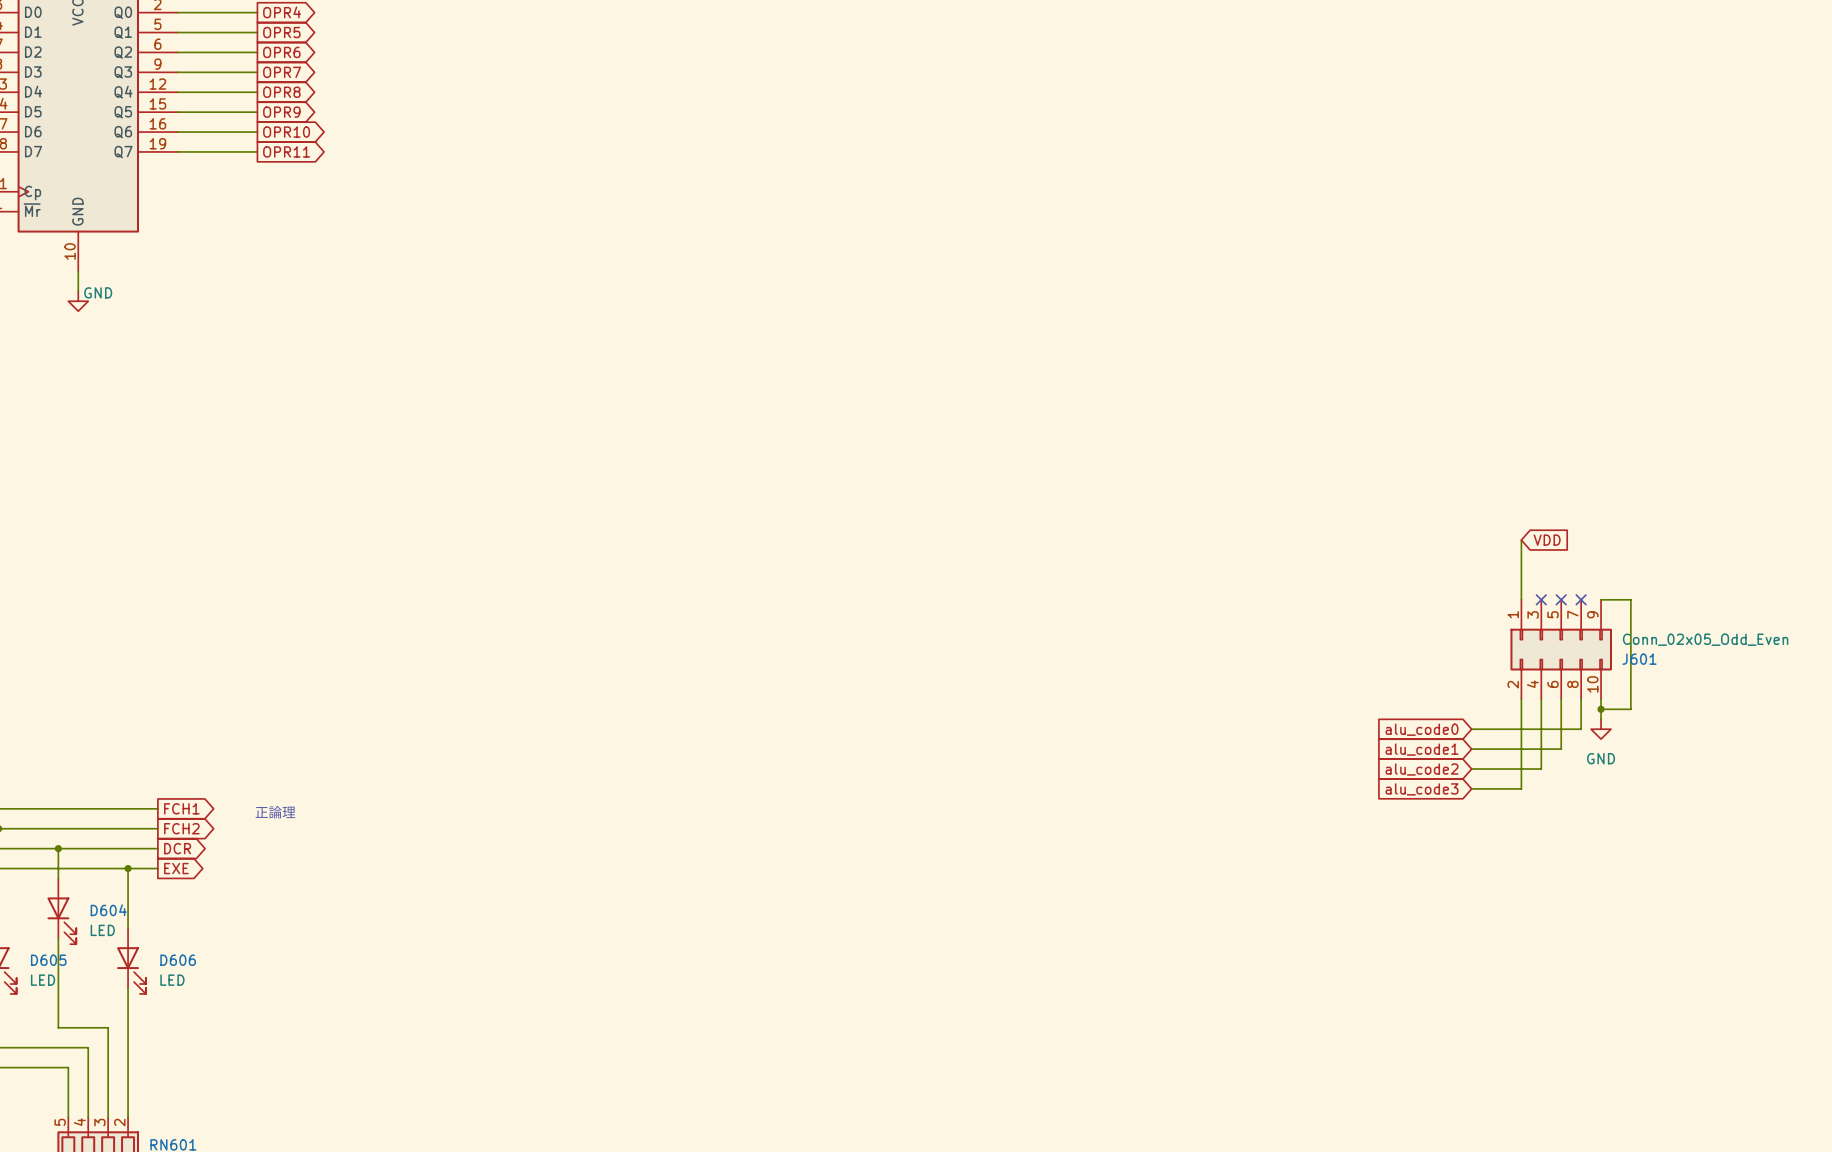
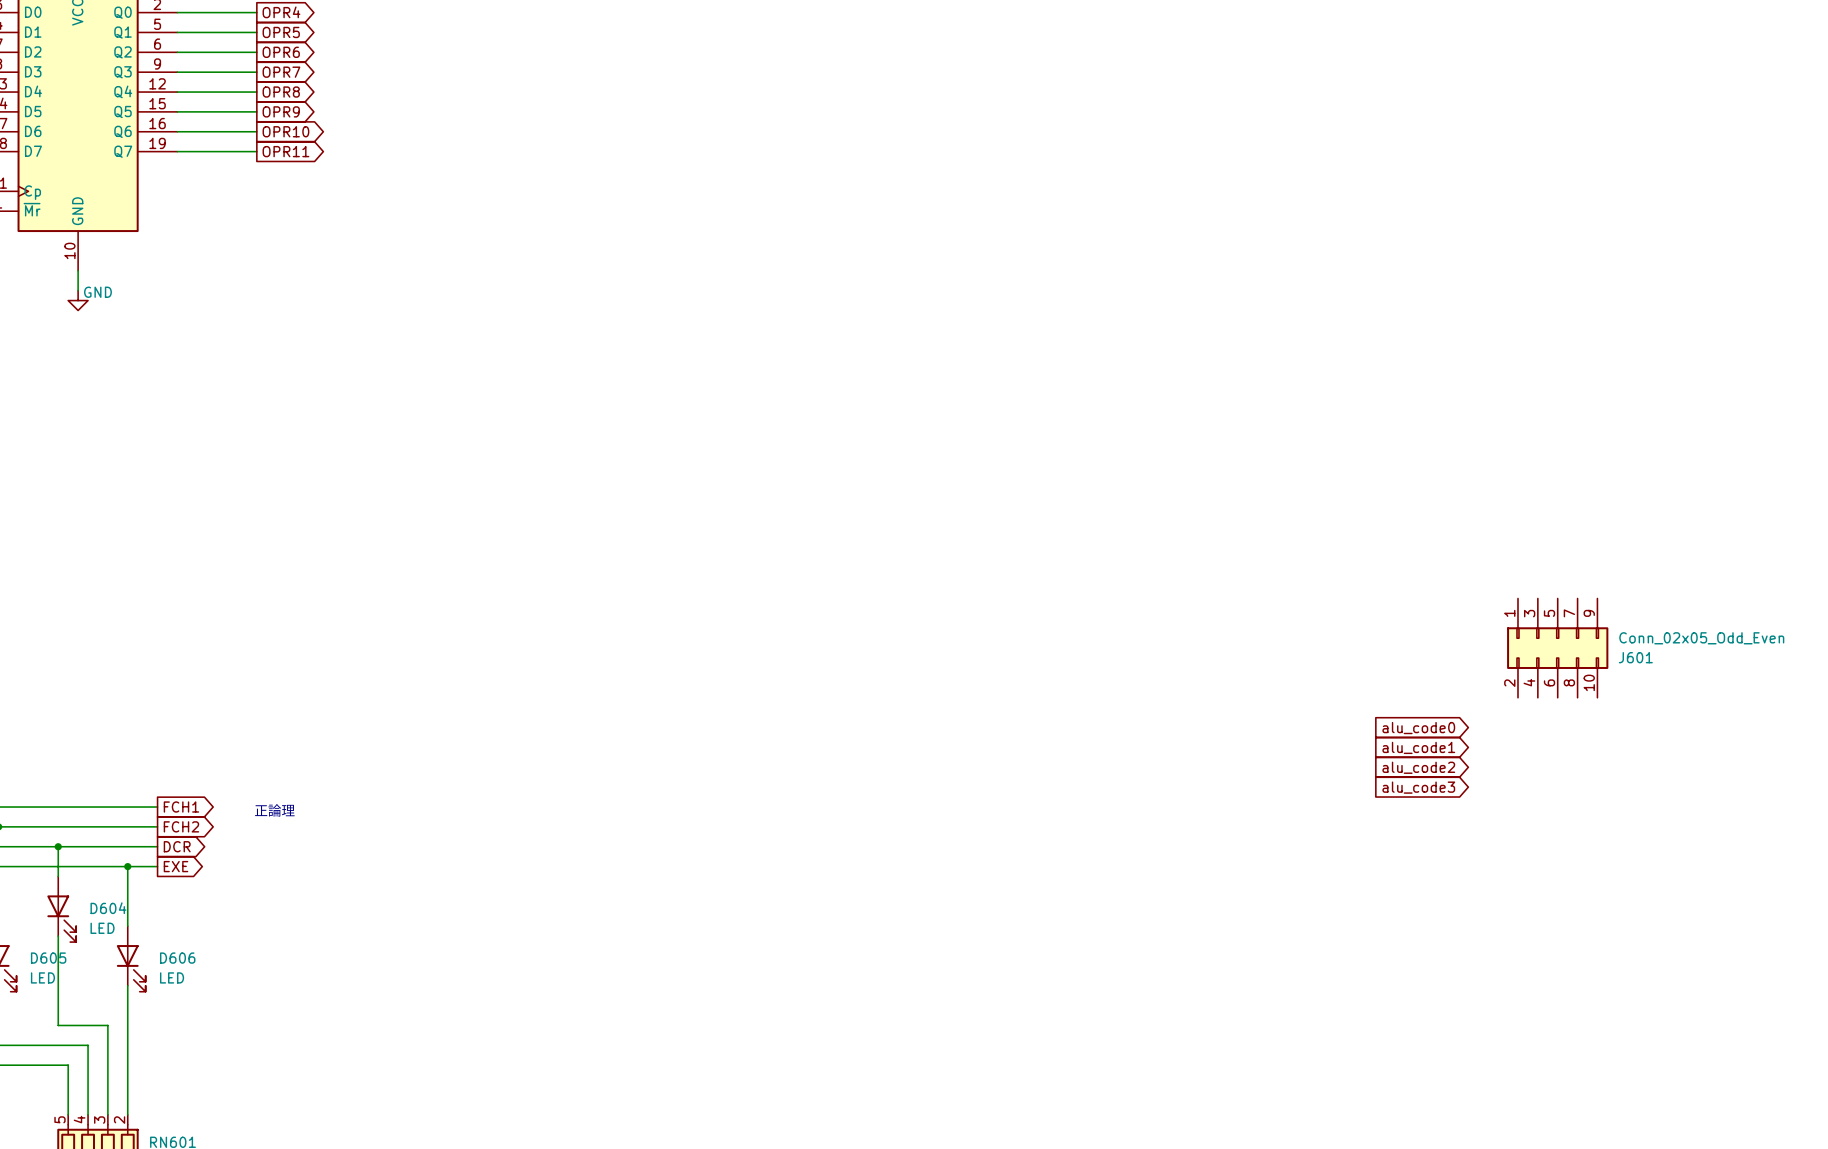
wire: (1521, 540) (1521, 599) -> none
global label: VDD (1547, 540) -> none
no-connect mark: (1541, 599) -> none
no-connect mark: (1561, 599) -> none
no-connect mark: (1581, 599) -> none
wire: (1601, 599) (1630, 599) (1630, 709) (1601, 709) -> none
wire: (1521, 699) (1521, 788) (1471, 788) -> none
wire: (1541, 699) (1541, 769) (1471, 769) -> none
wire: (1561, 699) (1561, 749) (1471, 749) -> none
wire: (1581, 699) (1581, 729) (1471, 729) -> none
wire: (1601, 699) (1601, 719) -> none
junction: (1601, 709) -> none
power symbol: GND (1601, 729) -> none

